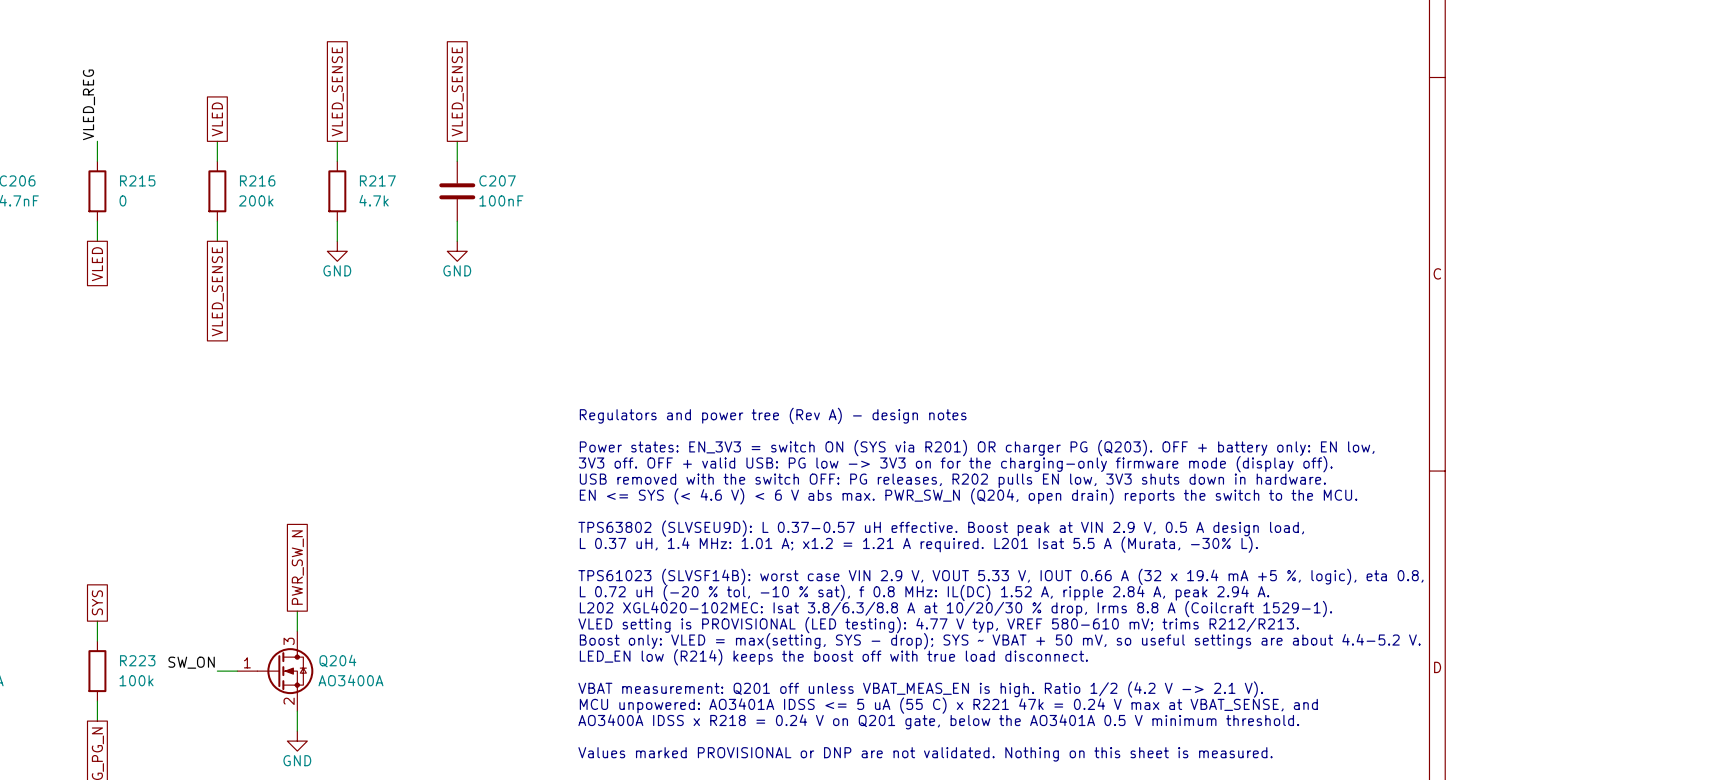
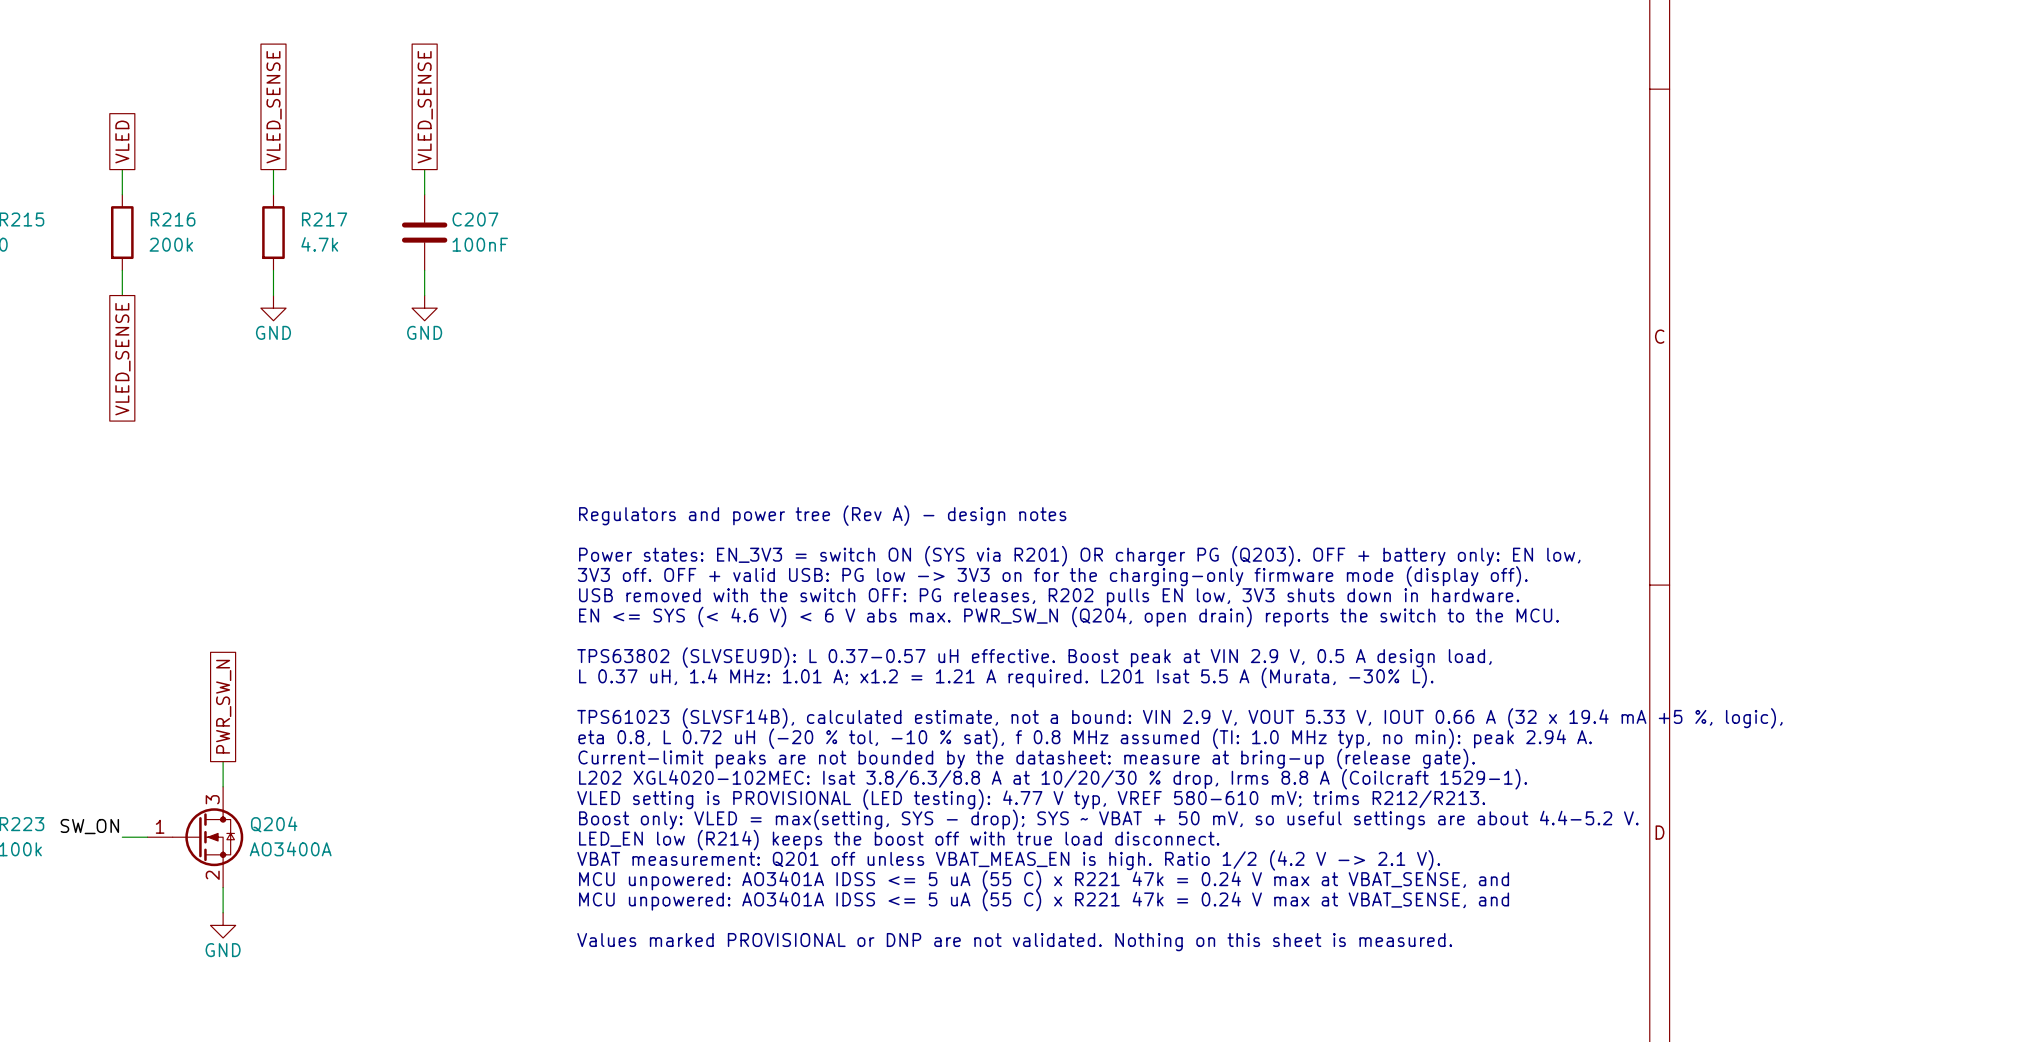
text: TPS61023 (SLVSF14B): worst case VIN 2.9 V, VOUT 5.33 V, IOUT 0.66 A (32 x 19.4 mA +5 %, logic), eta 0.8, (1000, 576) -> TPS61023 (SLVSF14B), calculated estimate, not a bound: VIN 2.9 V, VOUT 5.33 V, IOUT 0.66 A (32 x 19.4 mA +5 %, logic), (1179, 718)
text: L 0.72 uH (-20 % tol, -10 % sat), f 0.8 MHz: IL(DC) 1.52 A, ripple 2.84 A, peak 2.94 A. (924, 592) -> eta 0.8, L 0.72 uH (-20 % tol, -10 % sat), f 0.8 MHz assumed (TI: 1.0 MHz typ, no min): peak 2.94 A. (1085, 738)
text: L202 XGL4020-102MEC: Isat 3.8/6.3/8.8 A at 10/20/30 % drop, Irms 8.8 A (Coilcraft 1529-1). (955, 609) -> Current-limit peaks are not bounded by the datasheet: measure at bring-up (release gate). (1026, 758)
text: VLED setting is PROVISIONAL (LED testing): 4.77 V typ, VREF 580-610 mV; trims R212/R213. (938, 625) -> L202 XGL4020-102MEC: Isat 3.8/6.3/8.8 A at 10/20/30 % drop, Irms 8.8 A (Coilcraft 1529-1). (1053, 779)
text: Boost only: VLED = max(setting, SYS - drop); SYS ~ VBAT + 50 mV, so useful settings are about 4.4-5.2 V. (1000, 641) -> VLED setting is PROVISIONAL (LED testing): 4.77 V typ, VREF 580-610 mV; trims R212/R213. (1031, 799)
text: LED_EN low (R214) keeps the boost off with true load disconnect. (833, 657) -> Boost only: VLED = max(setting, SYS - drop); SYS ~ VBAT + 50 mV, so useful settings are about 4.4-5.2 V. (1108, 819)
text: none -> LED_EN low (R214) keeps the boost off with true load disconnect. (899, 840)
text: AO3400A IDSS x R218 = 0.24 V on Q201 gate, below the AO3401A 0.5 V minimum threshold. (938, 721) -> MCU unpowered: AO3401A IDSS <= 5 uA (55 C) x R221 47k = 0.24 V max at VBAT_SENSE, and (1044, 900)

